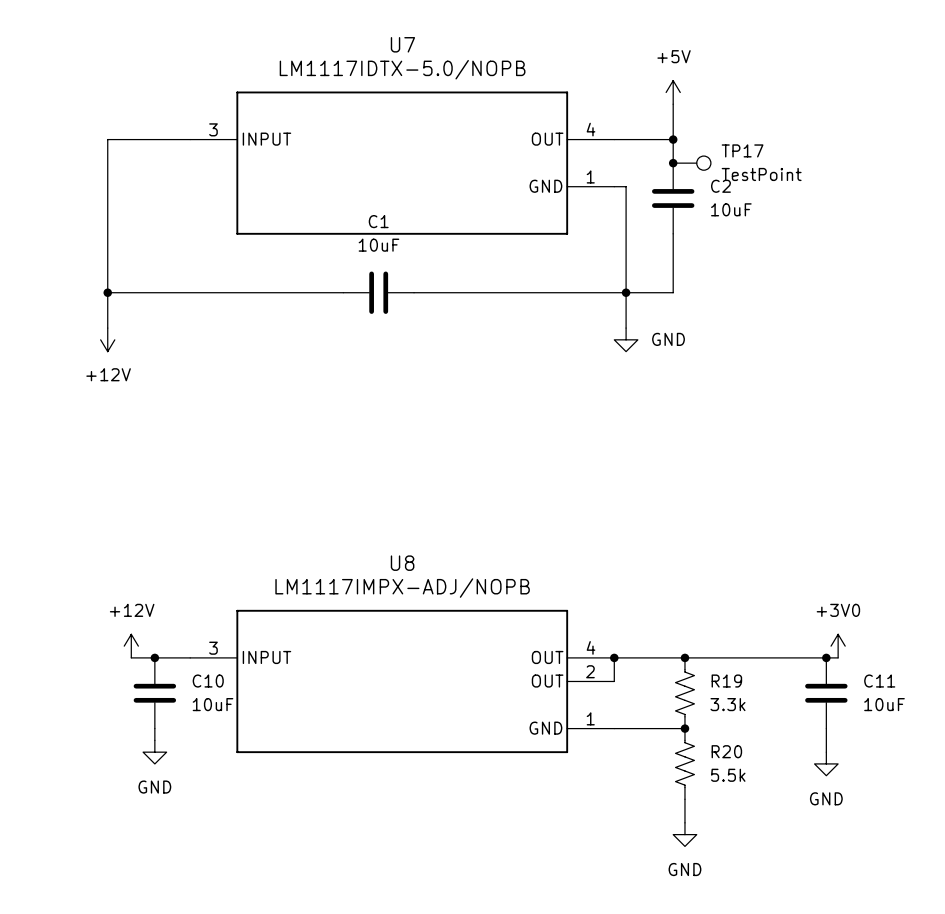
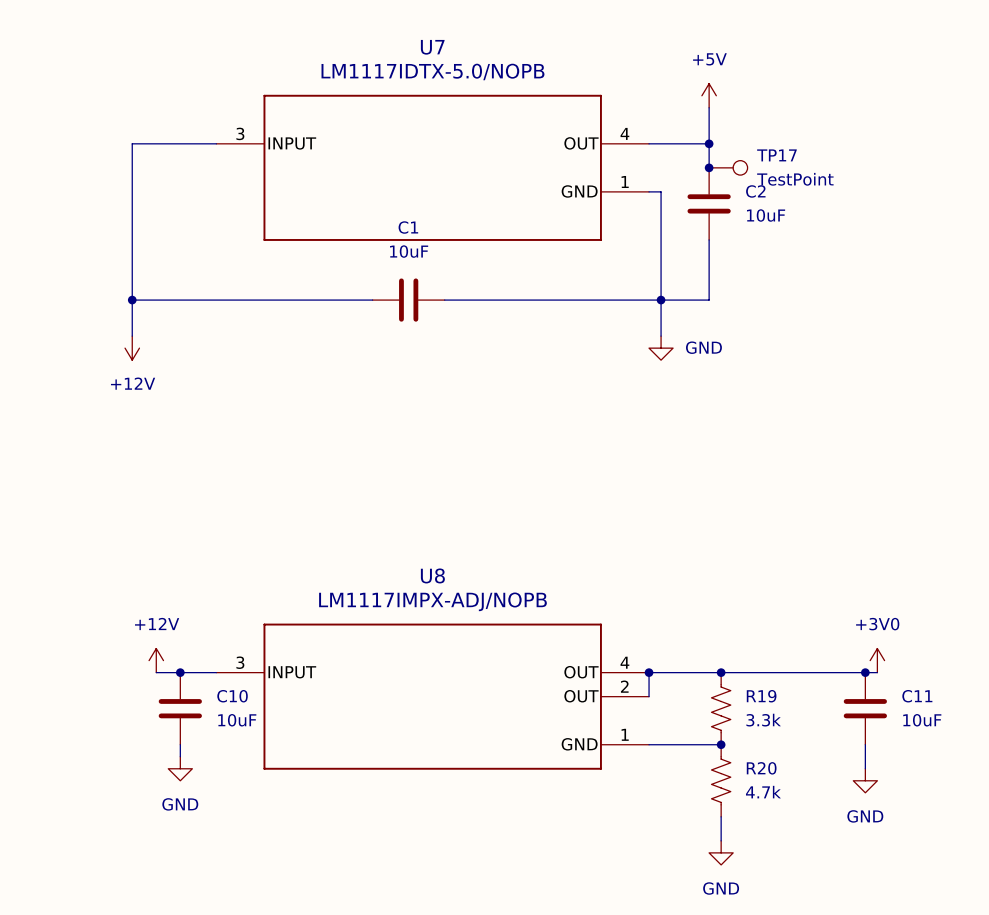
R20 value: 5.5k (728, 775) -> 4.7k (763, 792)

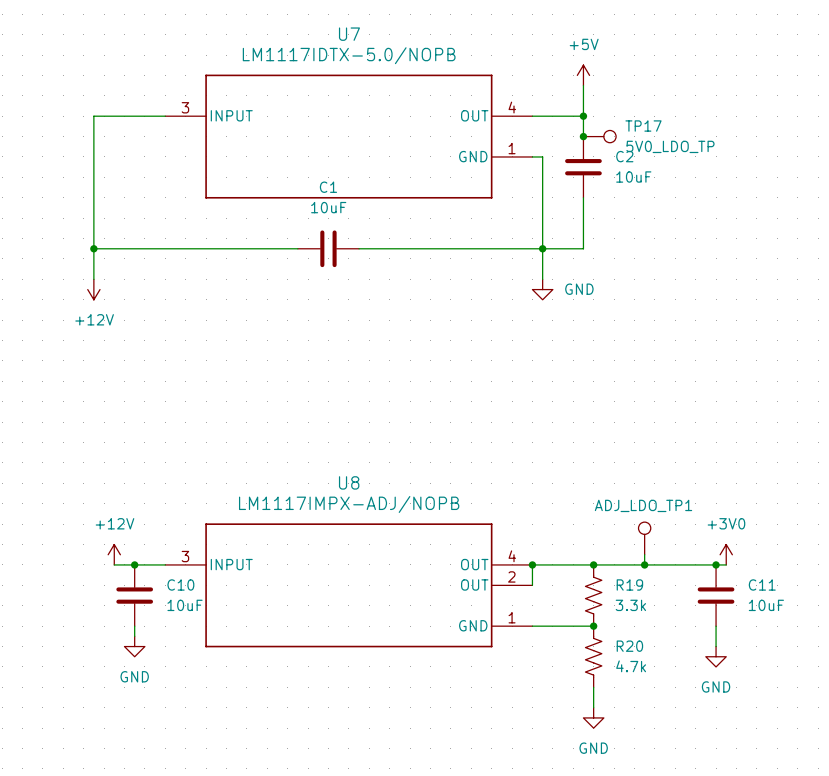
TP17 value: TestPoint (795, 179) -> 5V0_LDO_TP (670, 146)
ADJ_LDO_TP1: none -> (644, 538)
wire: none -> (644, 554) (644, 564)
junction: none -> (644, 564)

